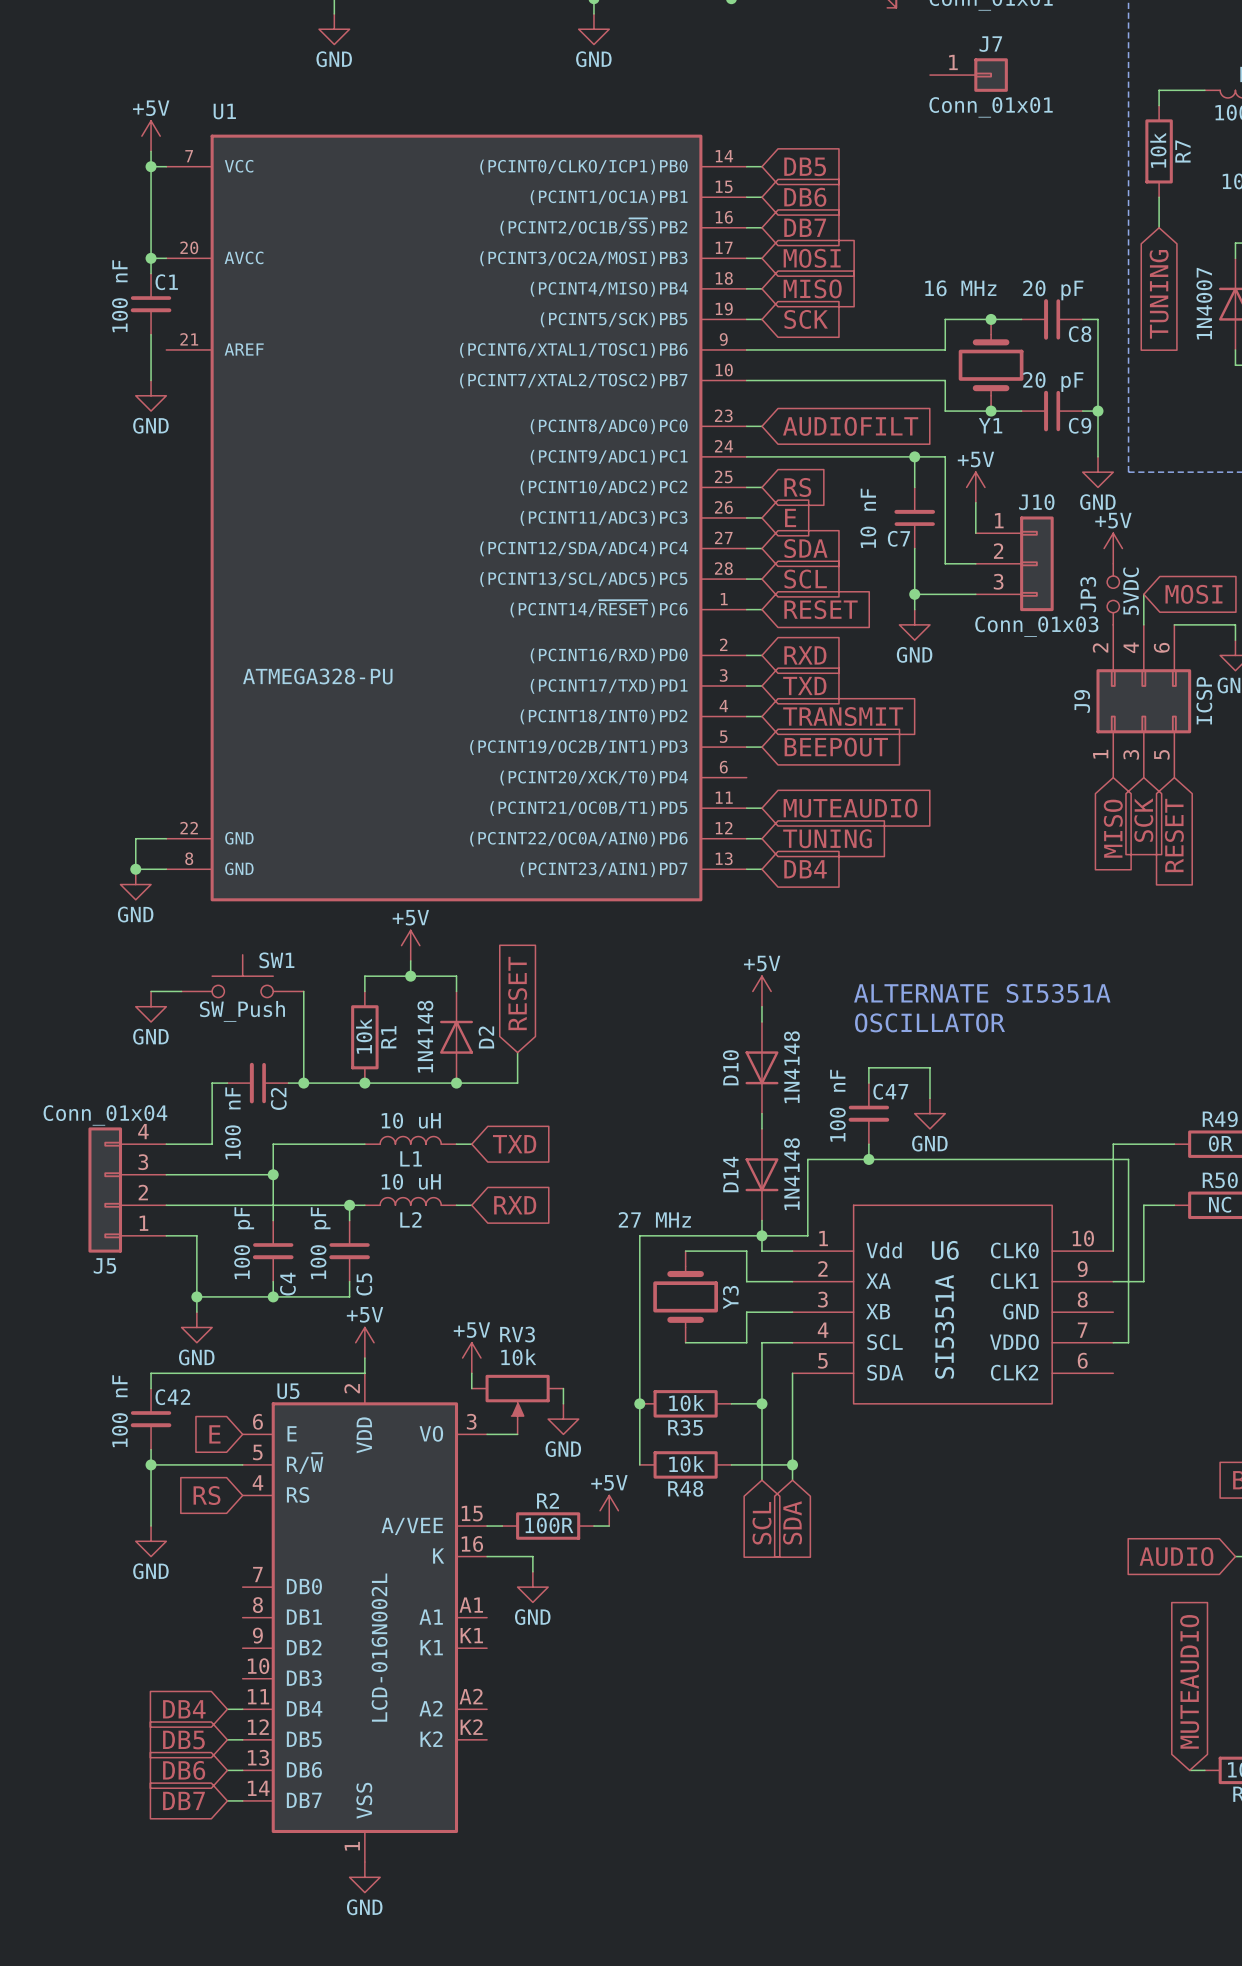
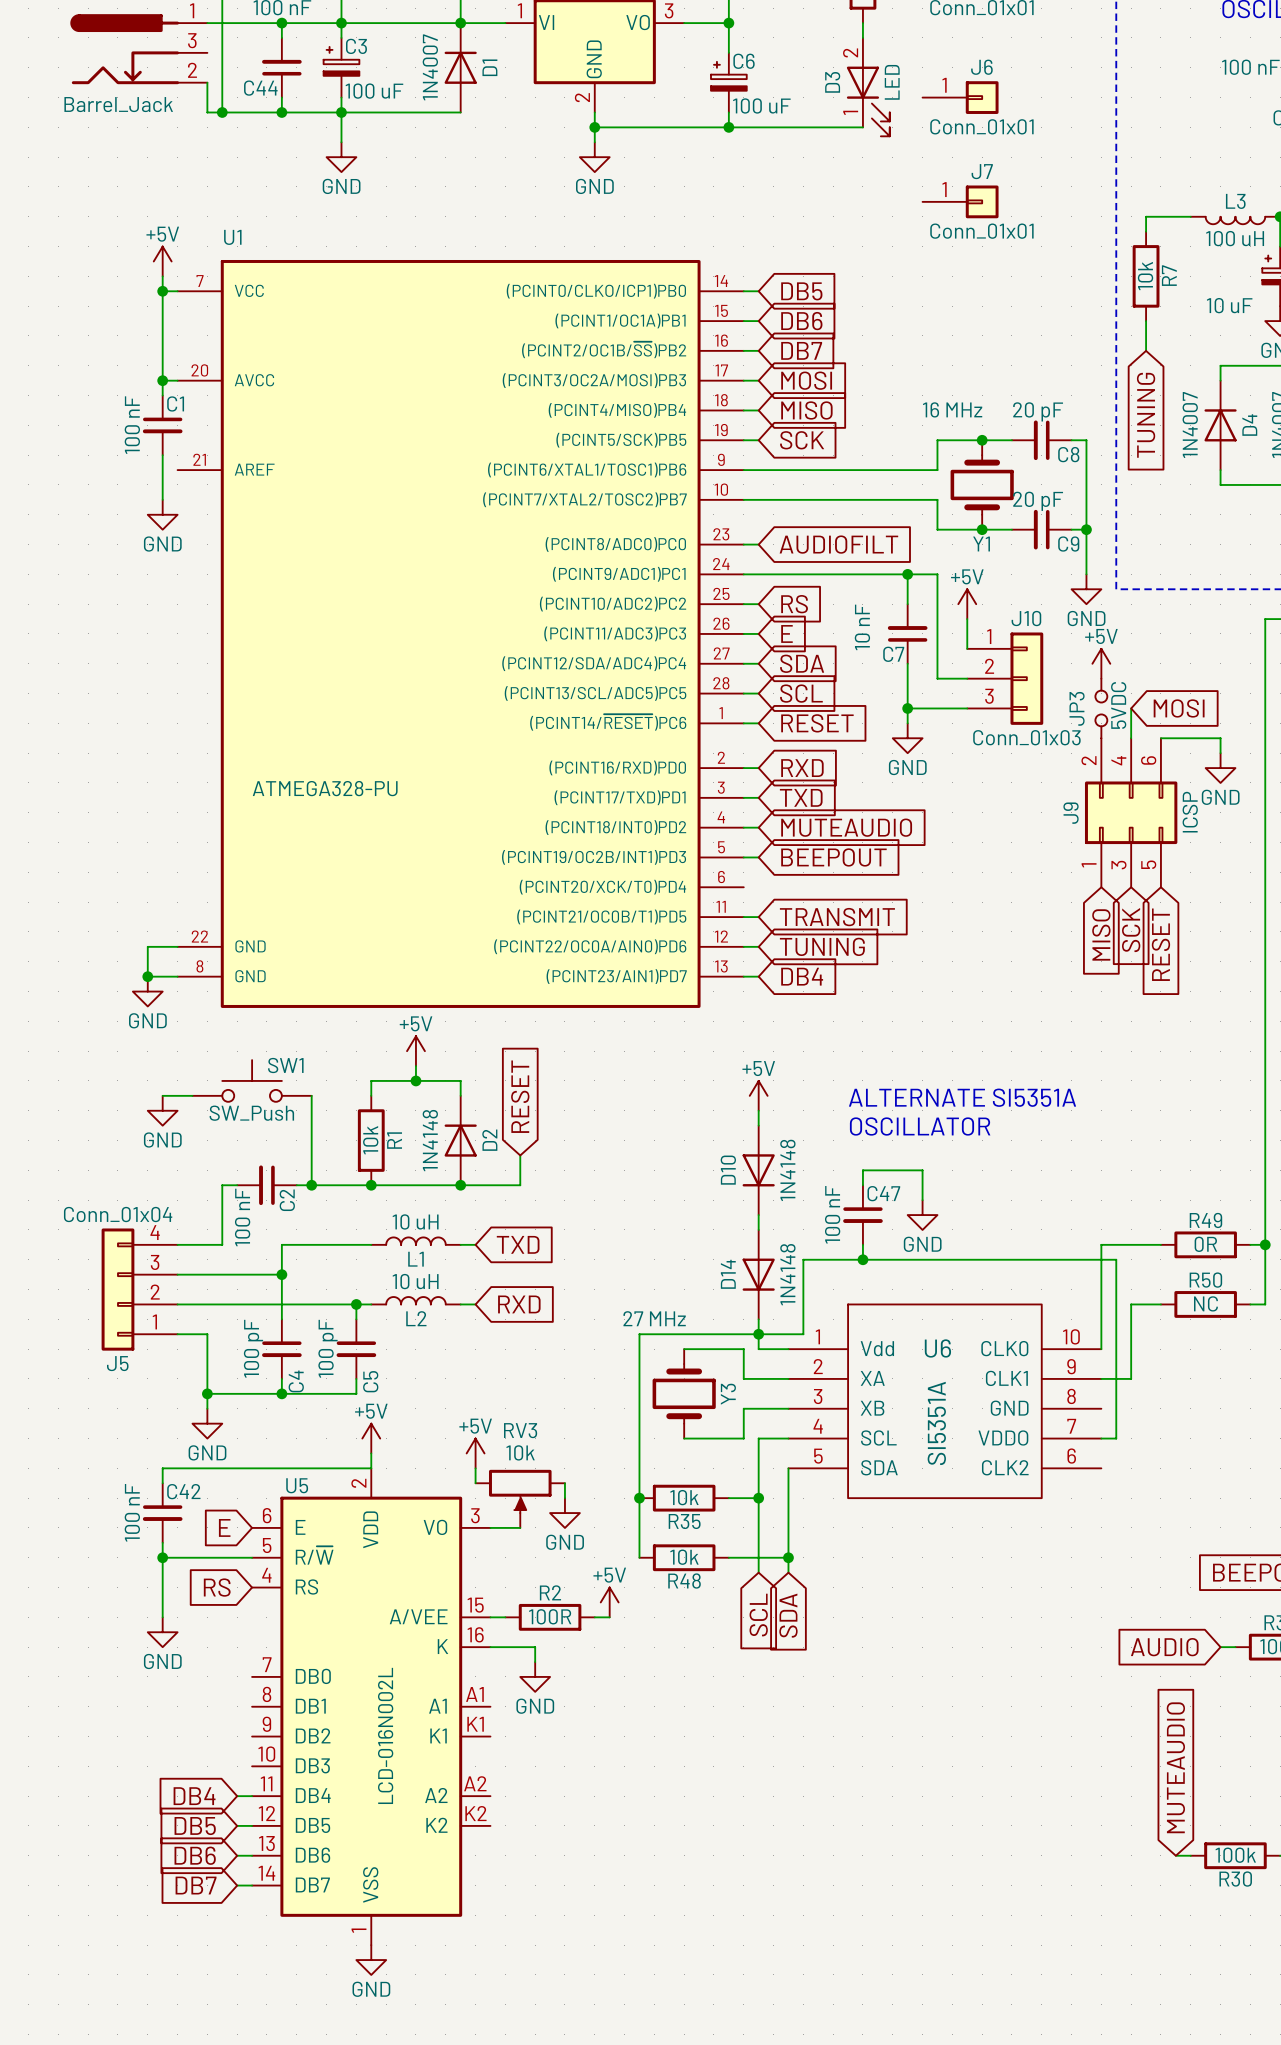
global label: TRANSMIT (843, 716) -> MUTEAUDIO (846, 827)
global label: MUTEAUDIO (850, 808) -> TRANSMIT (837, 917)

